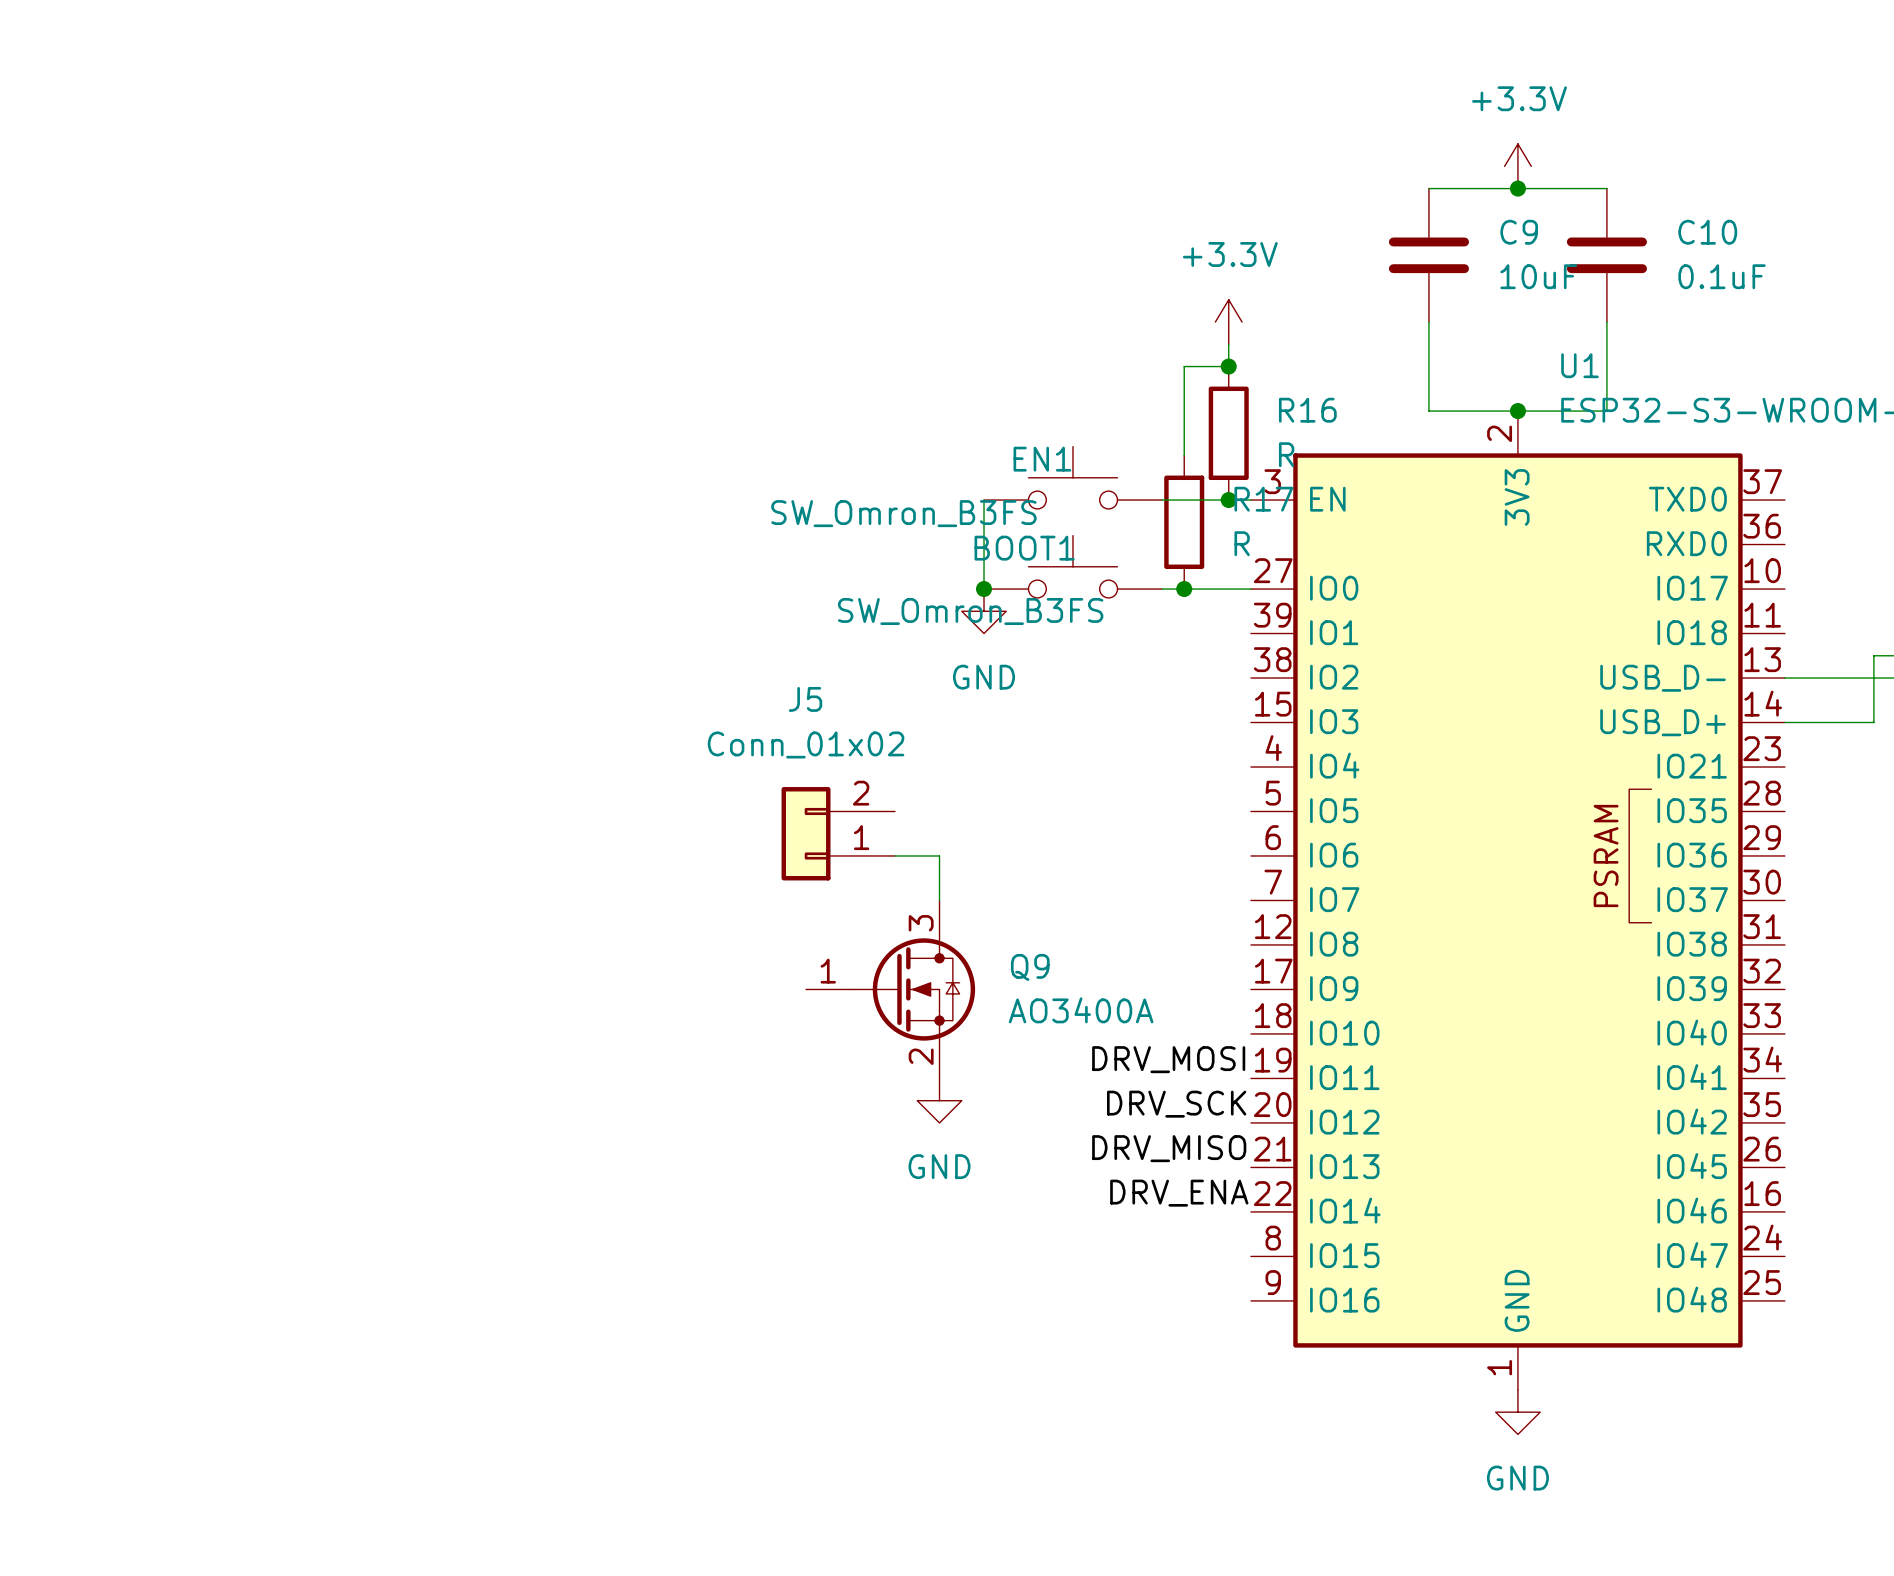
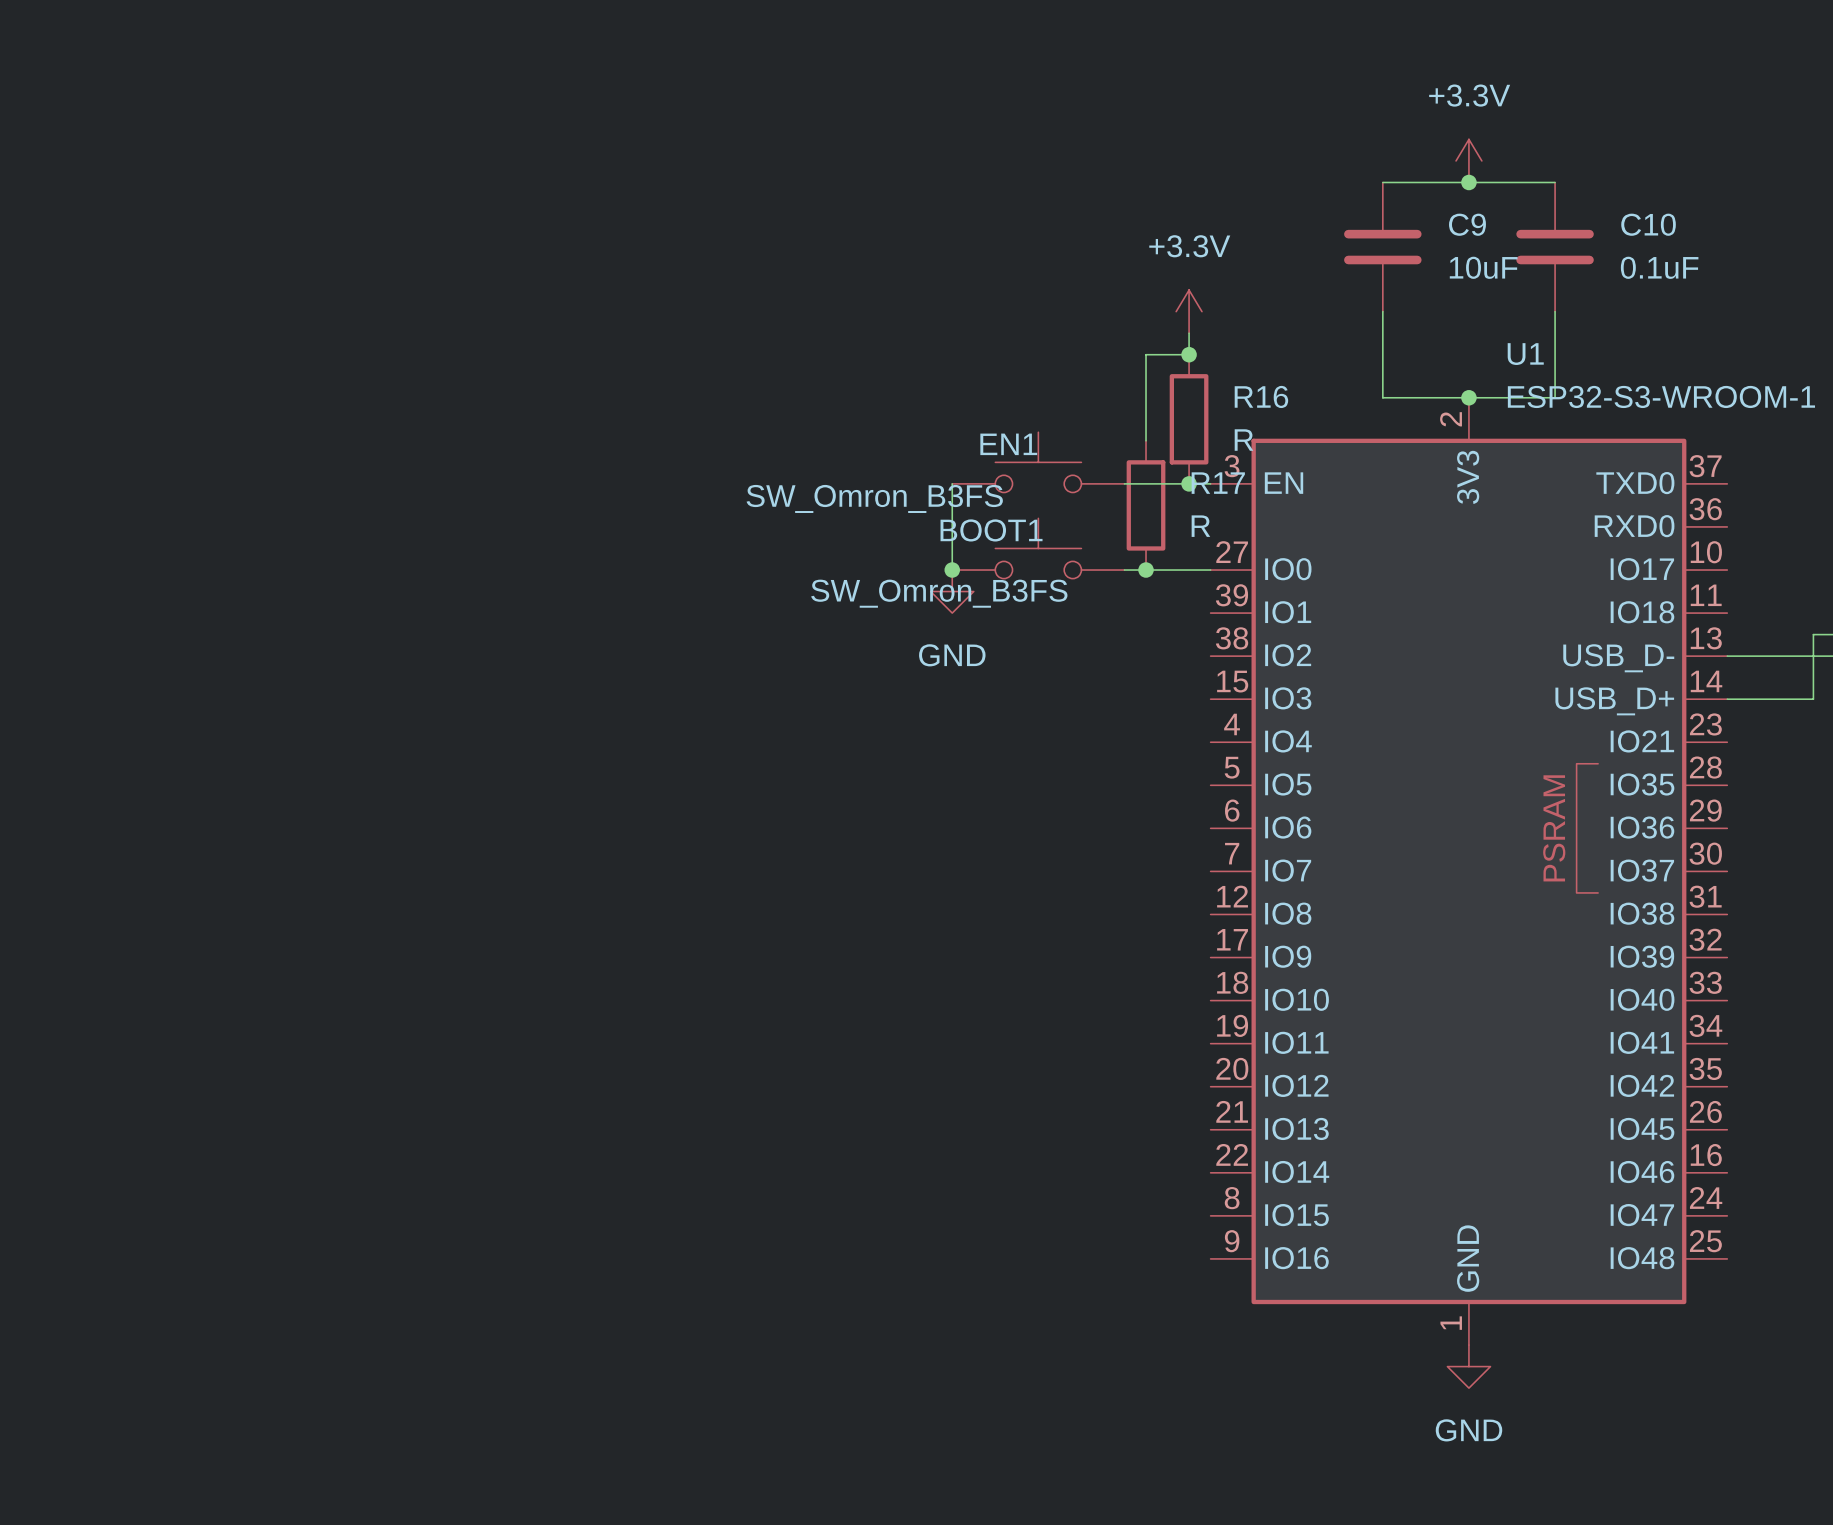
J5: Conn_01x02 (838, 833) -> none
wire: (895, 855) (939, 855) (939, 900) -> none
Q9: AO3400A (890, 989) -> none
label: DRV_MOSI (1168, 1059) -> none
power symbol: GND (939, 1100) -> none
label: DRV_SCK (1176, 1104) -> none
label: DRV_MISO (1169, 1148) -> none
label: DRV_ENA (1179, 1193) -> none

